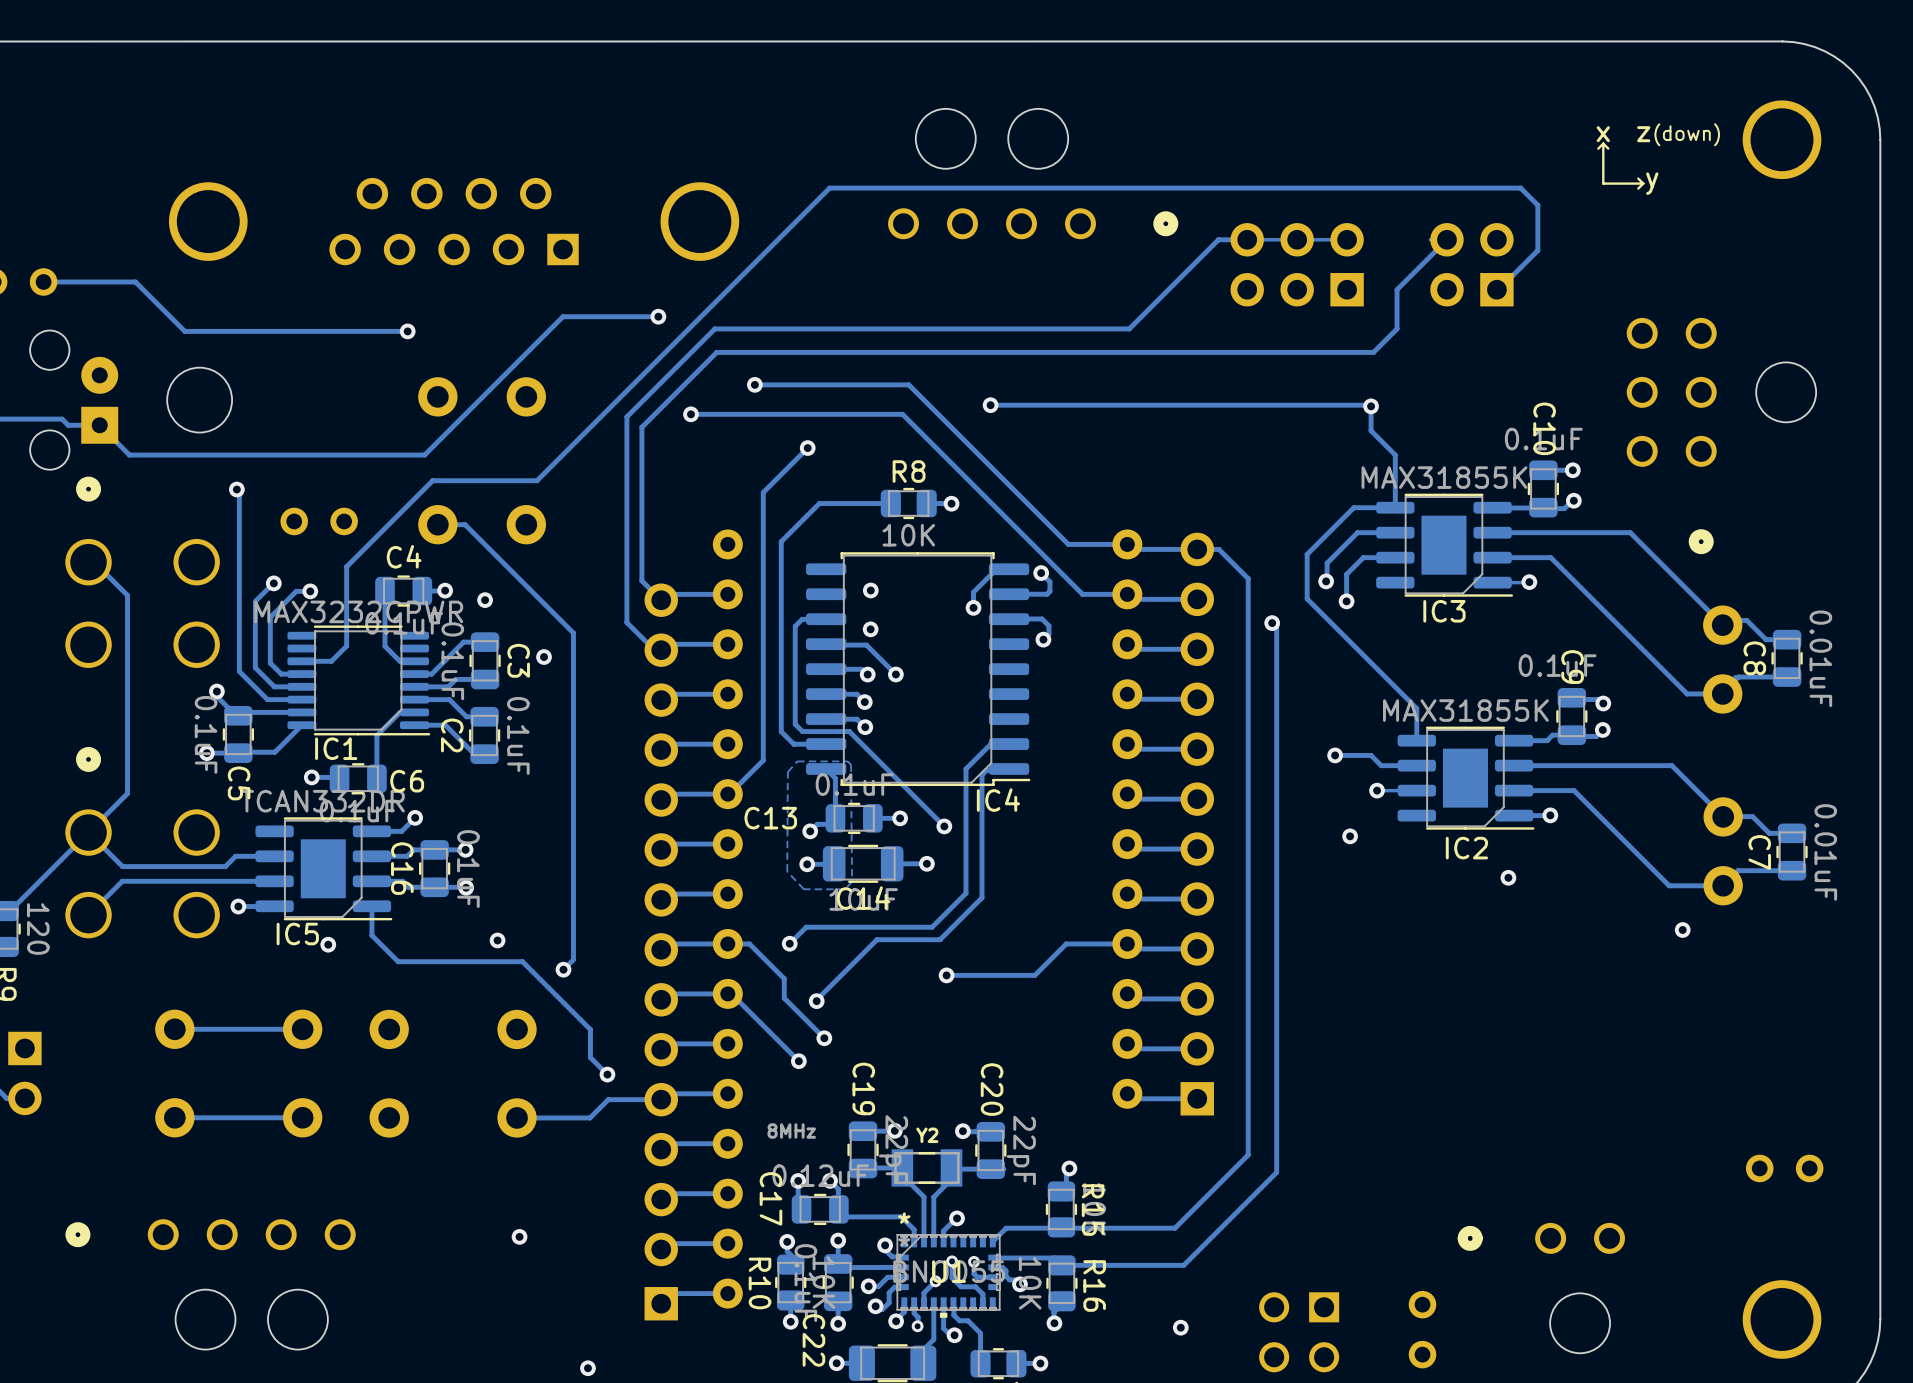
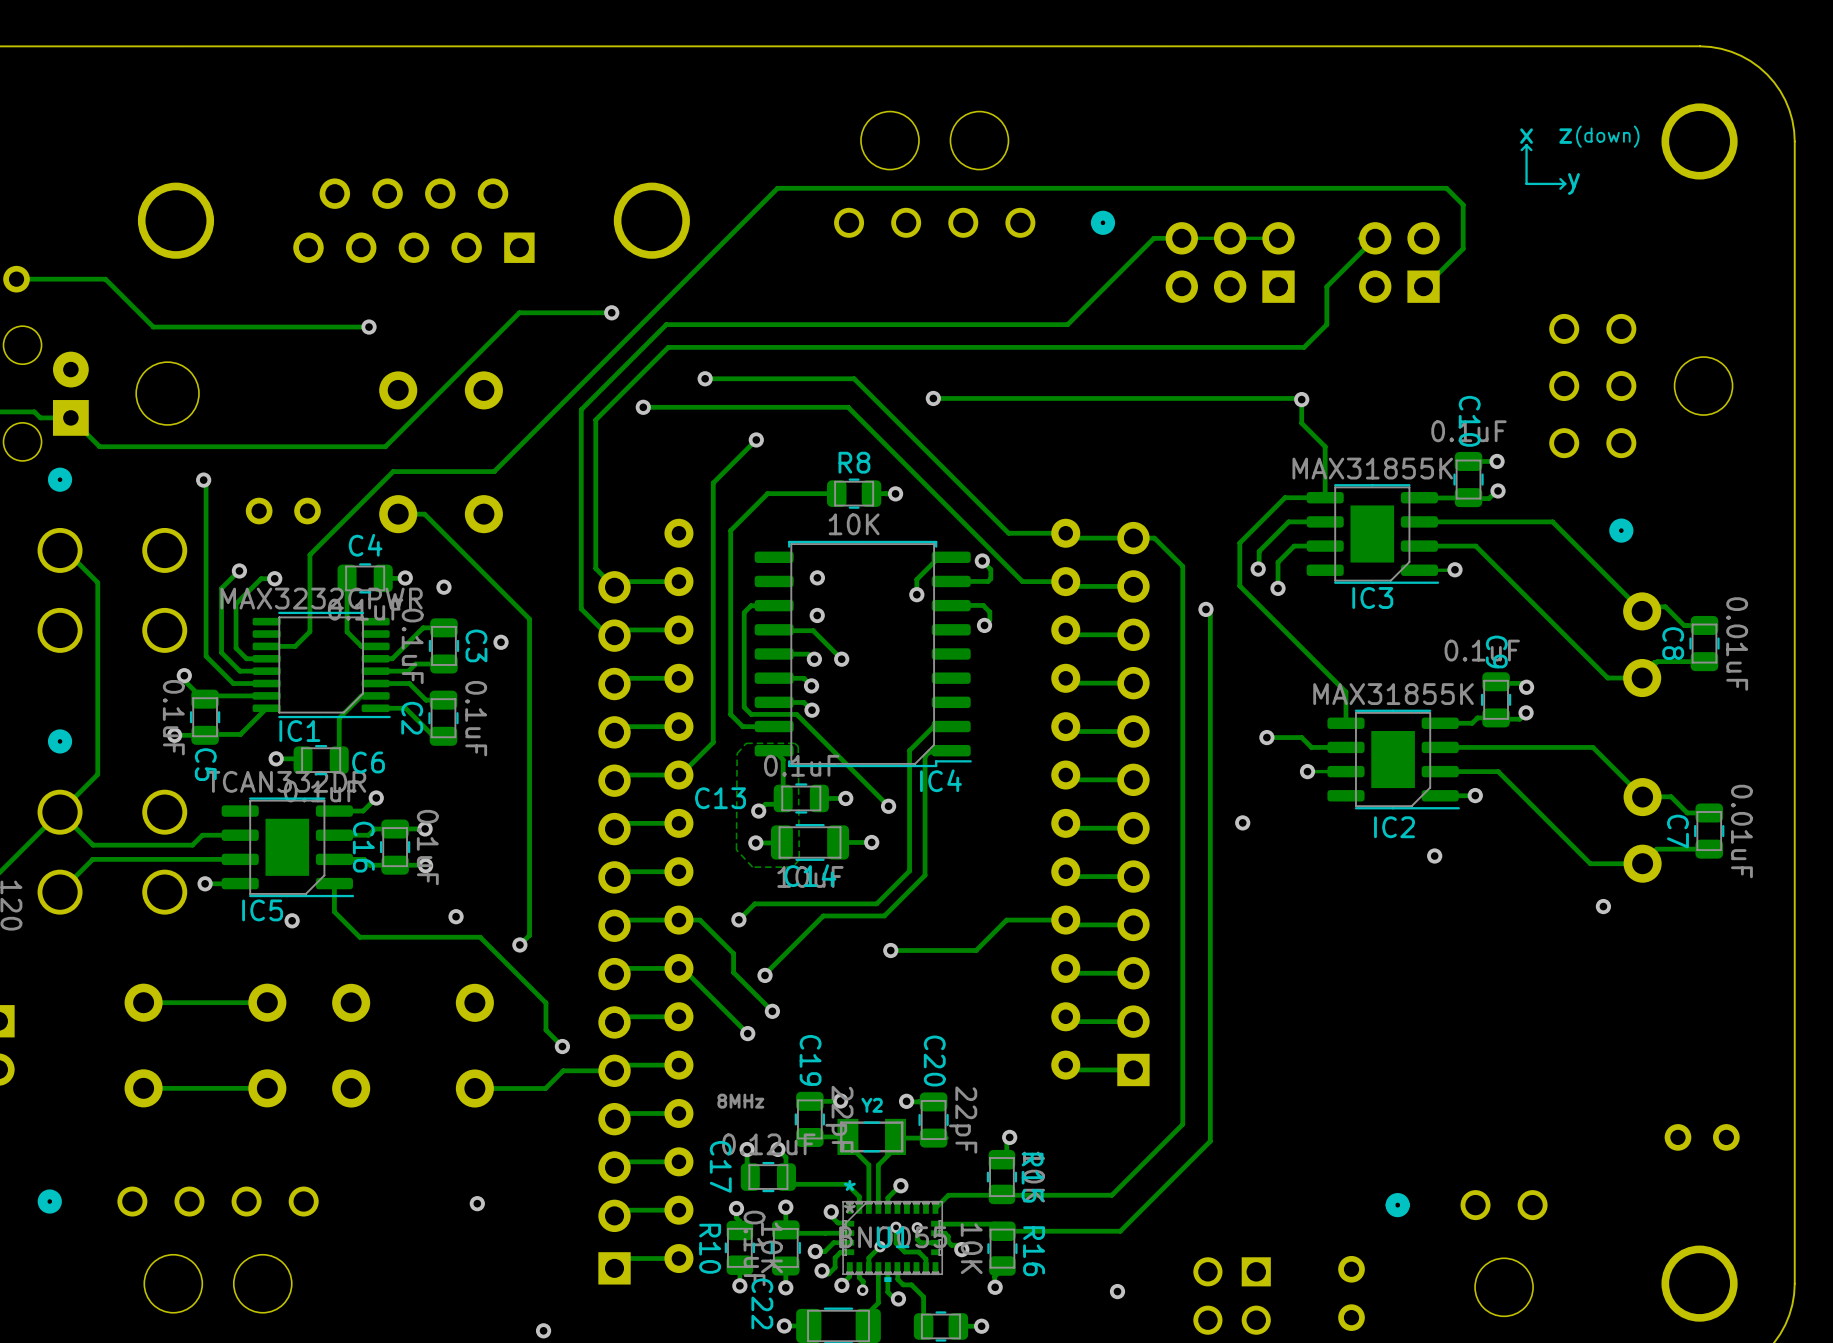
via position: (1350, 836) -> (1242, 822)

